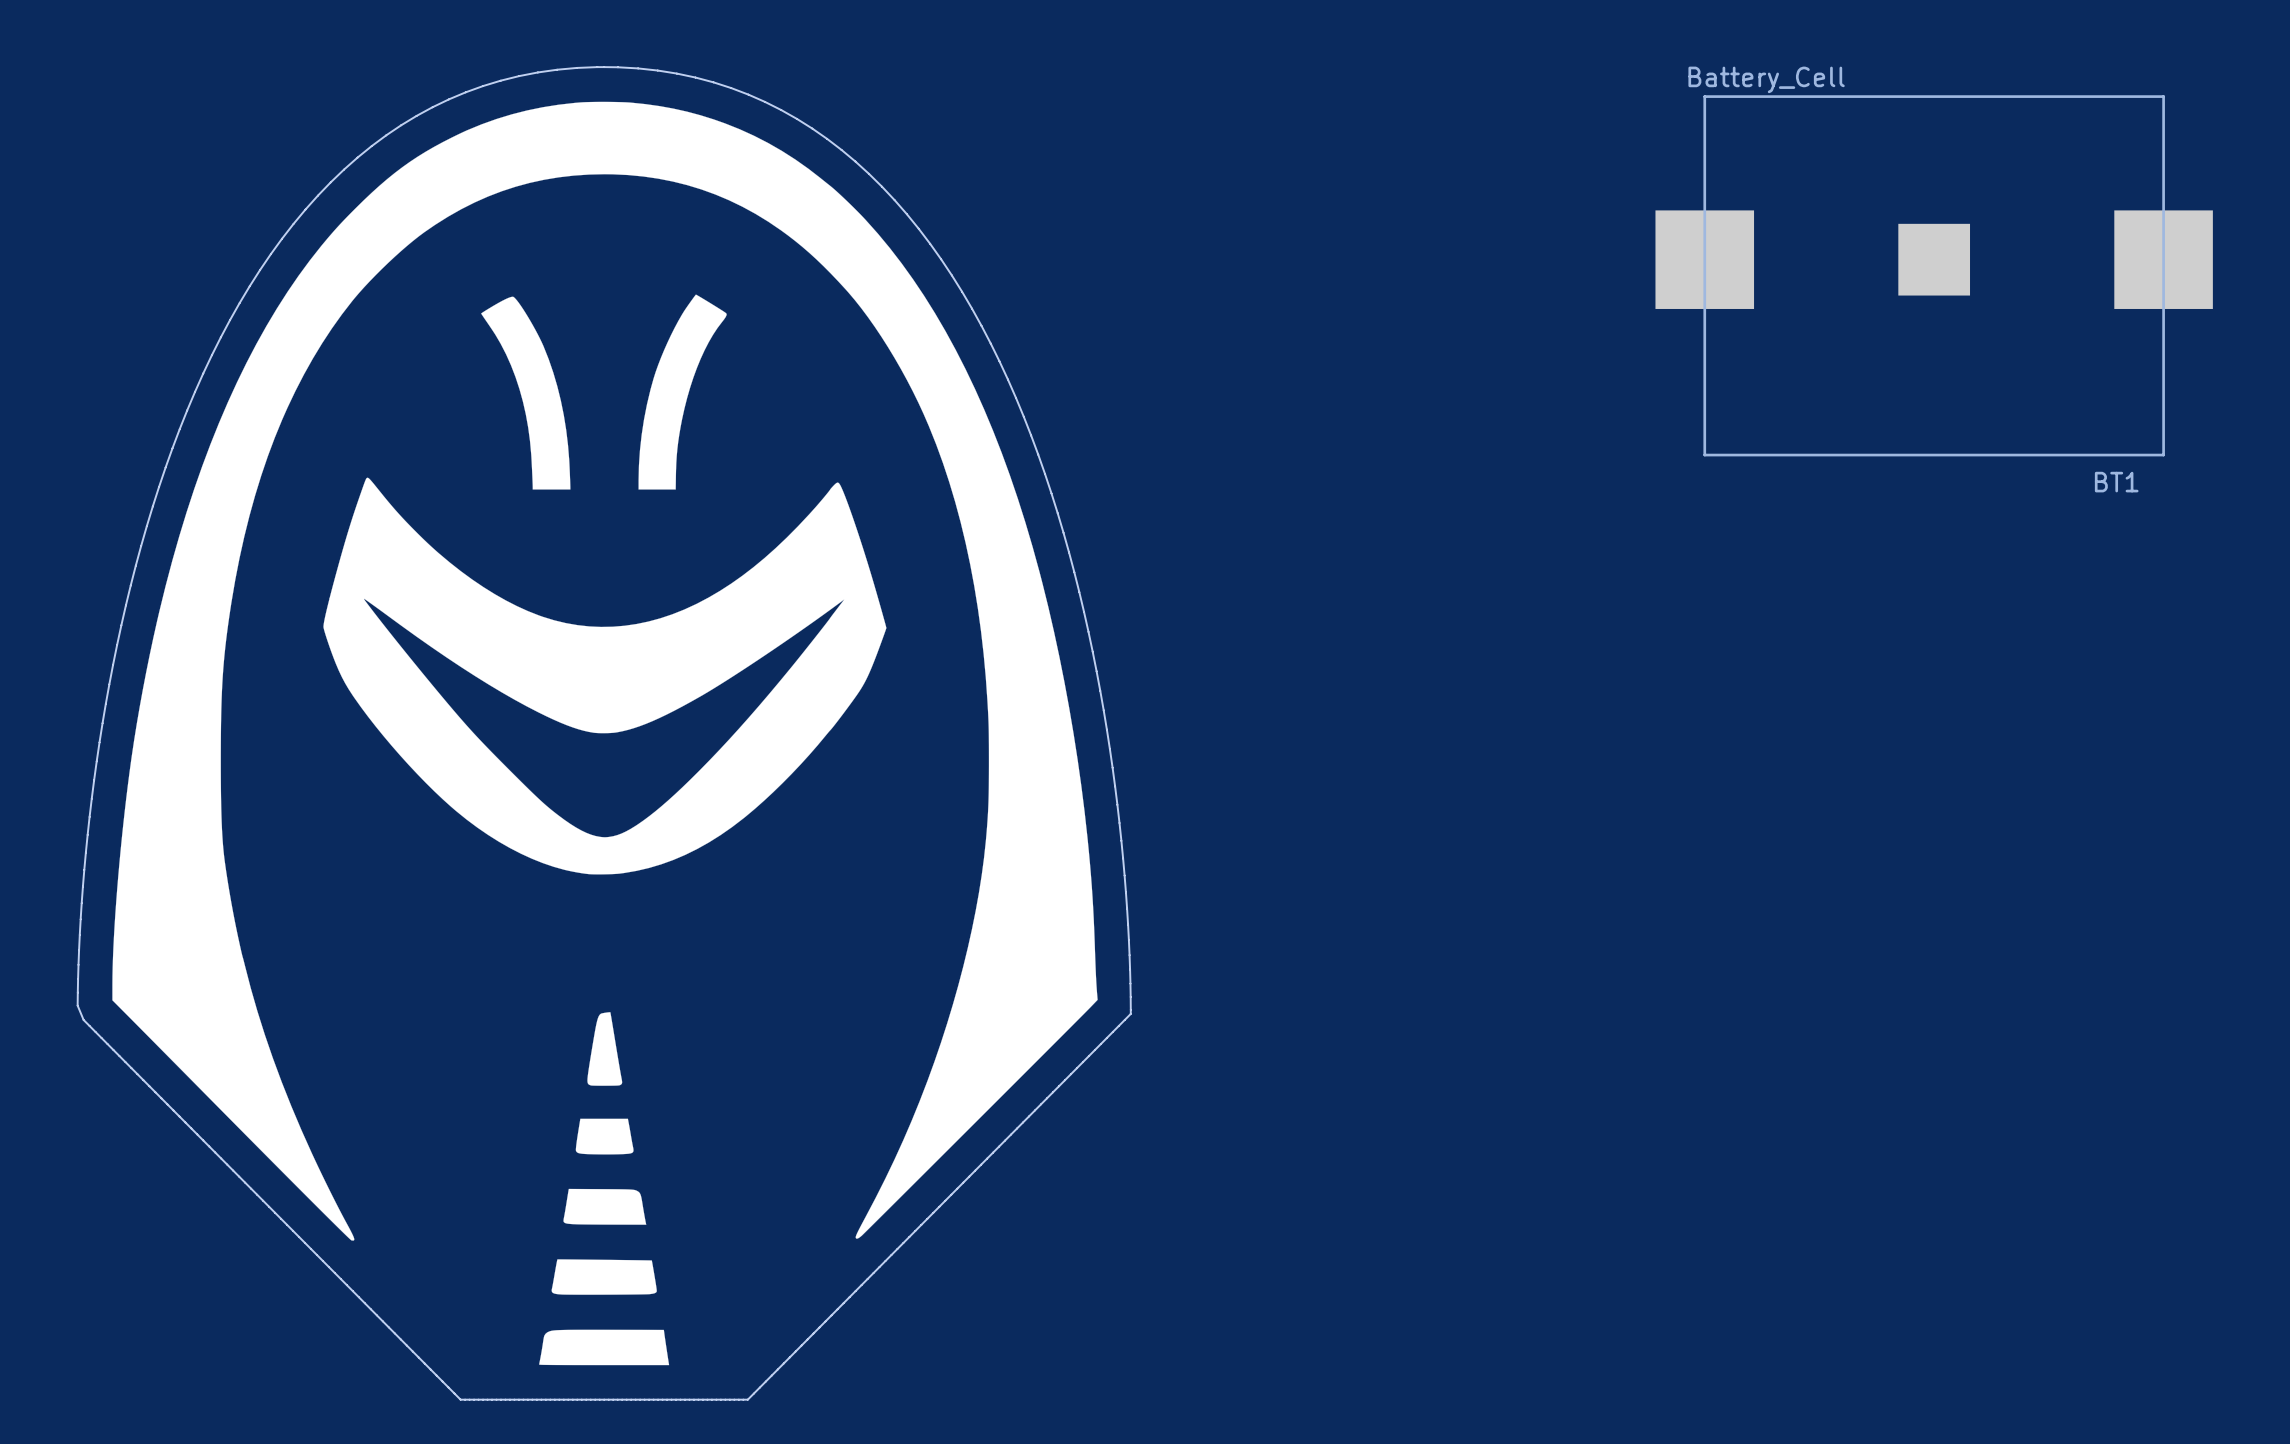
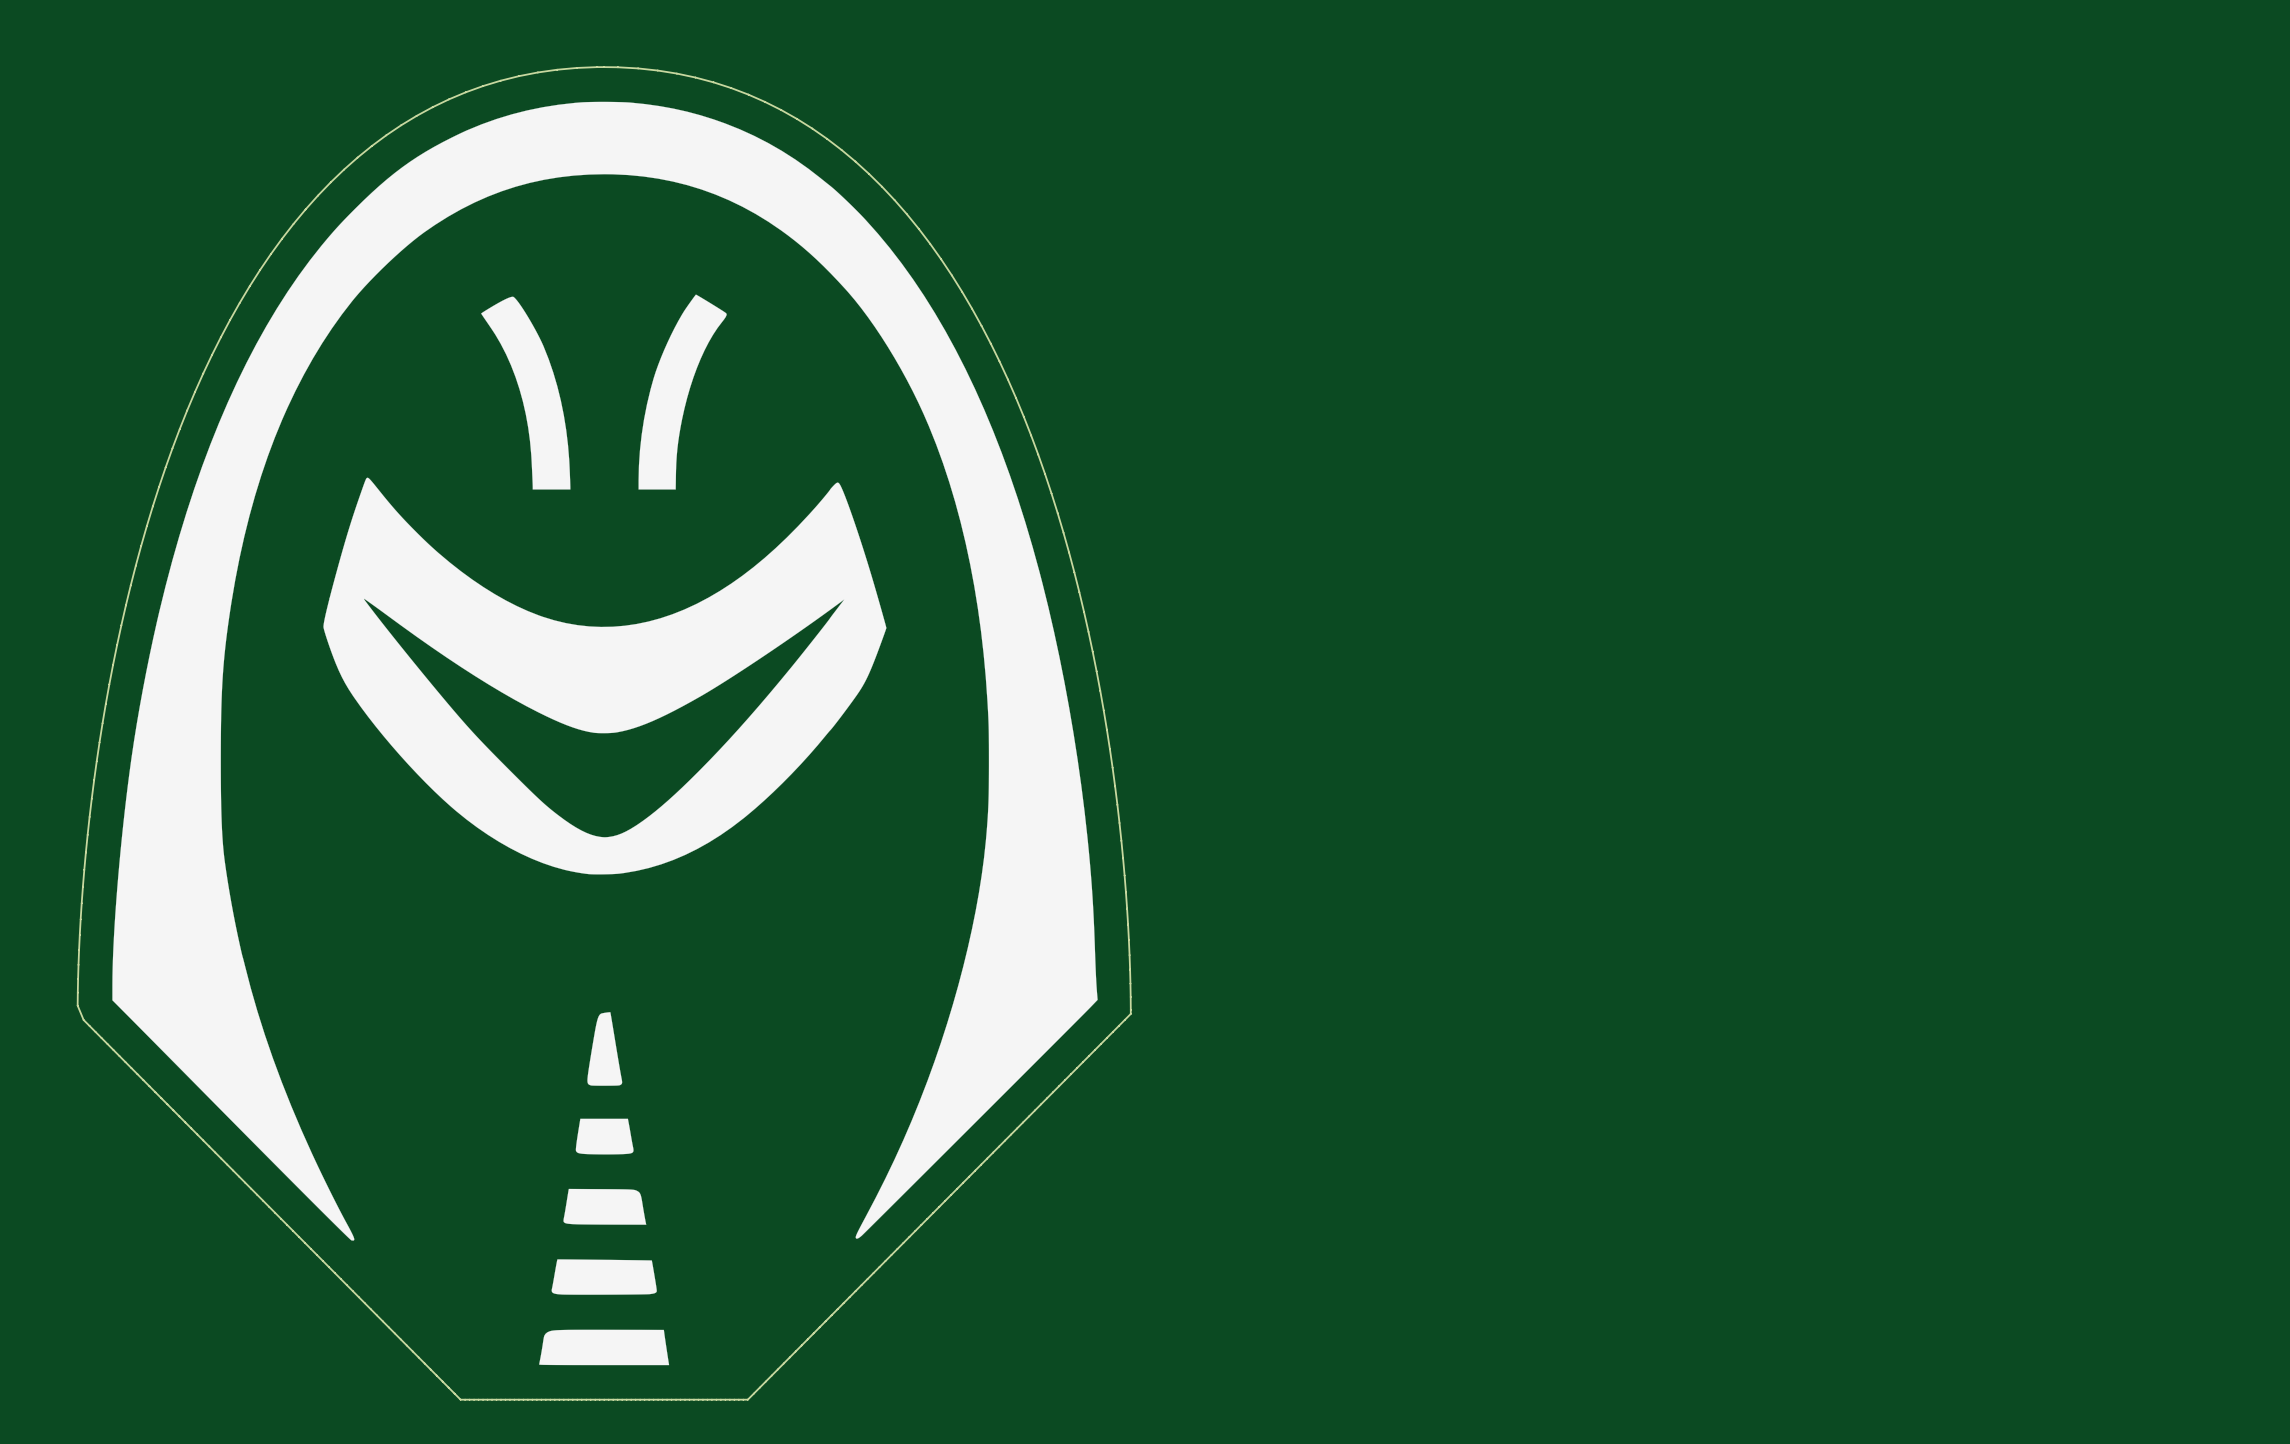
BT1: Battery_Cell (1934, 275) -> none

